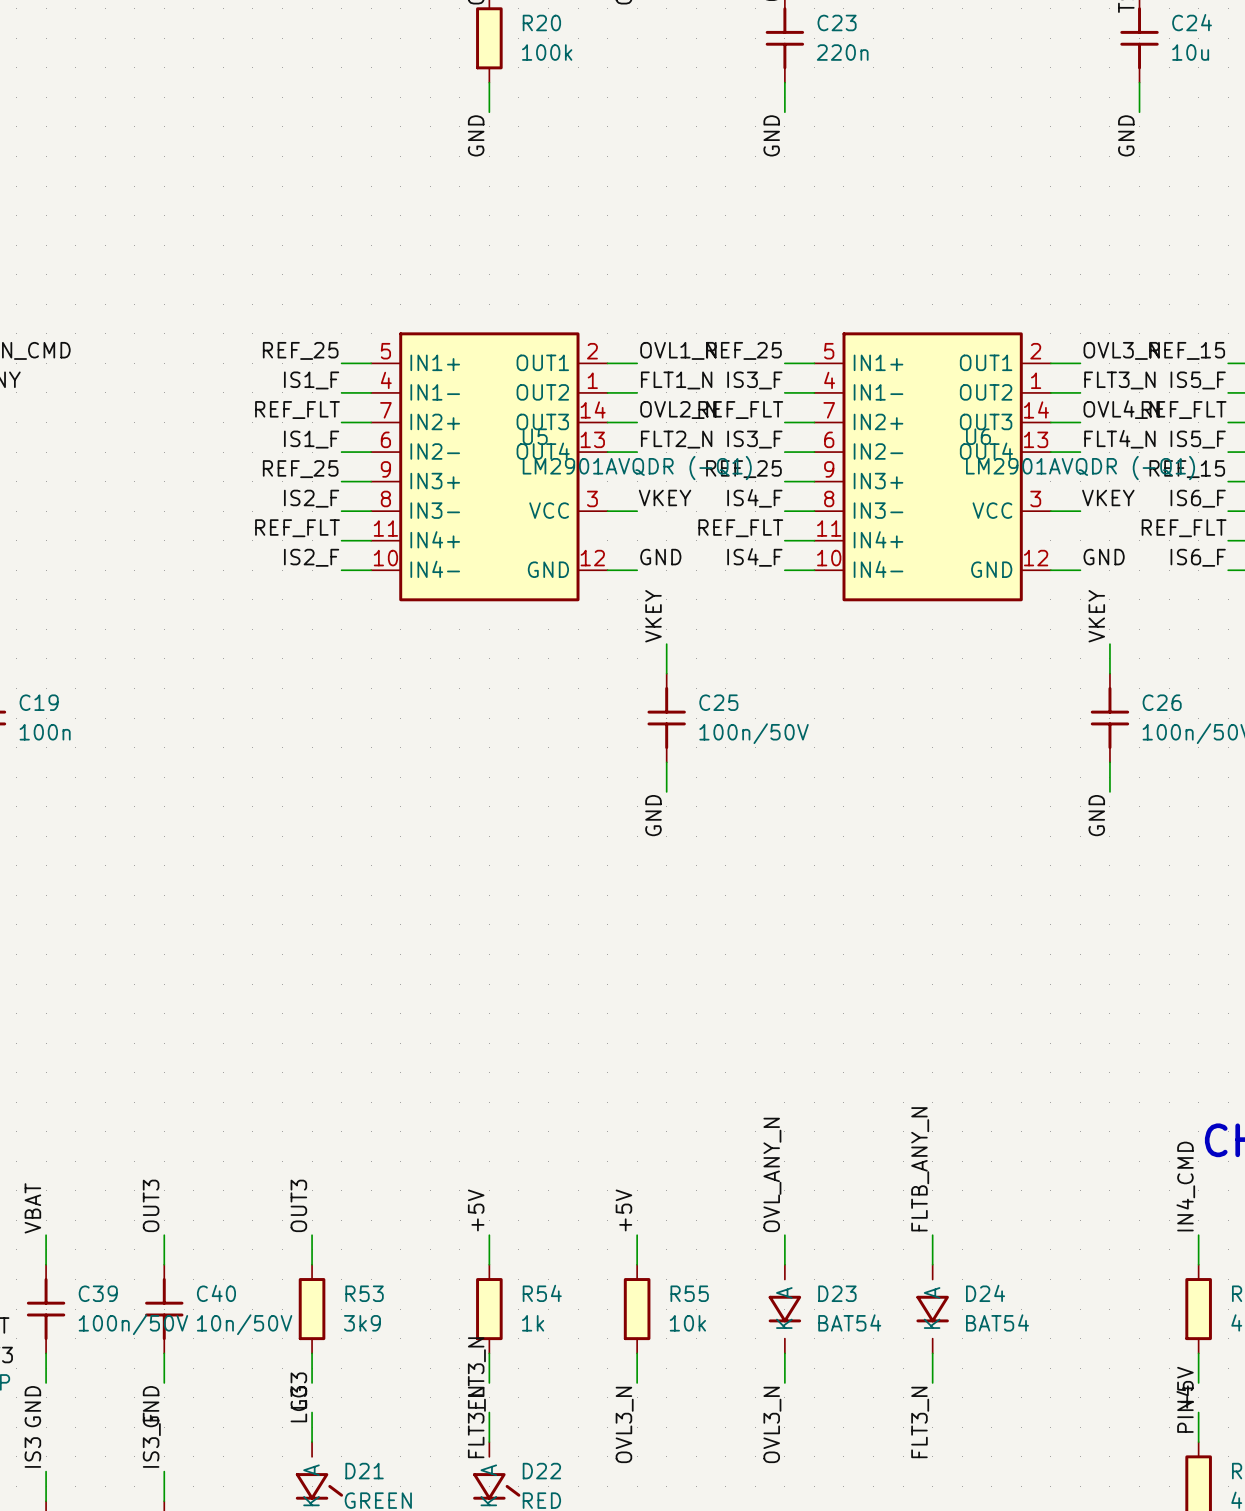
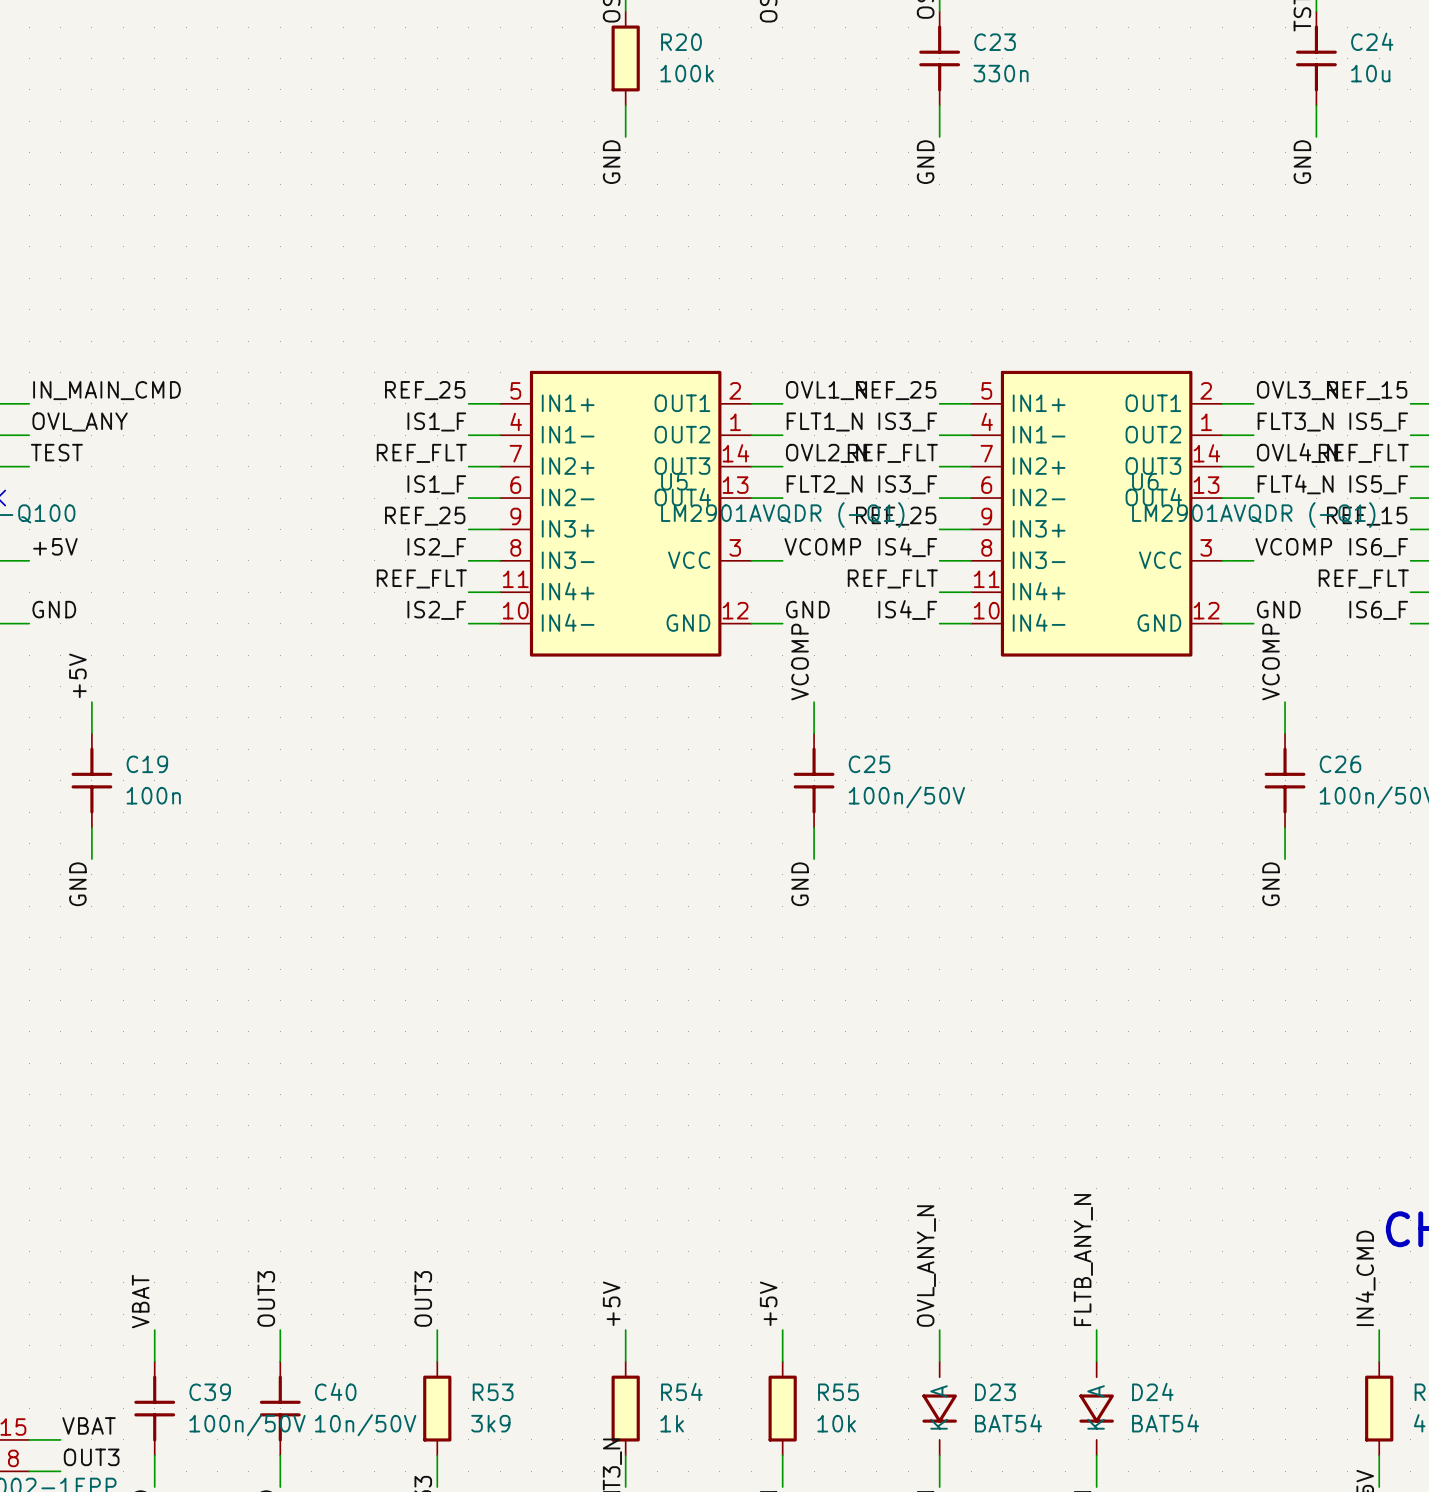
C23 value: 220n (842, 52) -> 330n (1001, 73)
label: VKEY (665, 497) -> VCOMP (822, 546)
label: VKEY (1108, 497) -> VCOMP (1293, 546)
label: VKEY (653, 616) -> VCOMP (800, 662)
label: VKEY (1096, 616) -> VCOMP (1271, 662)

